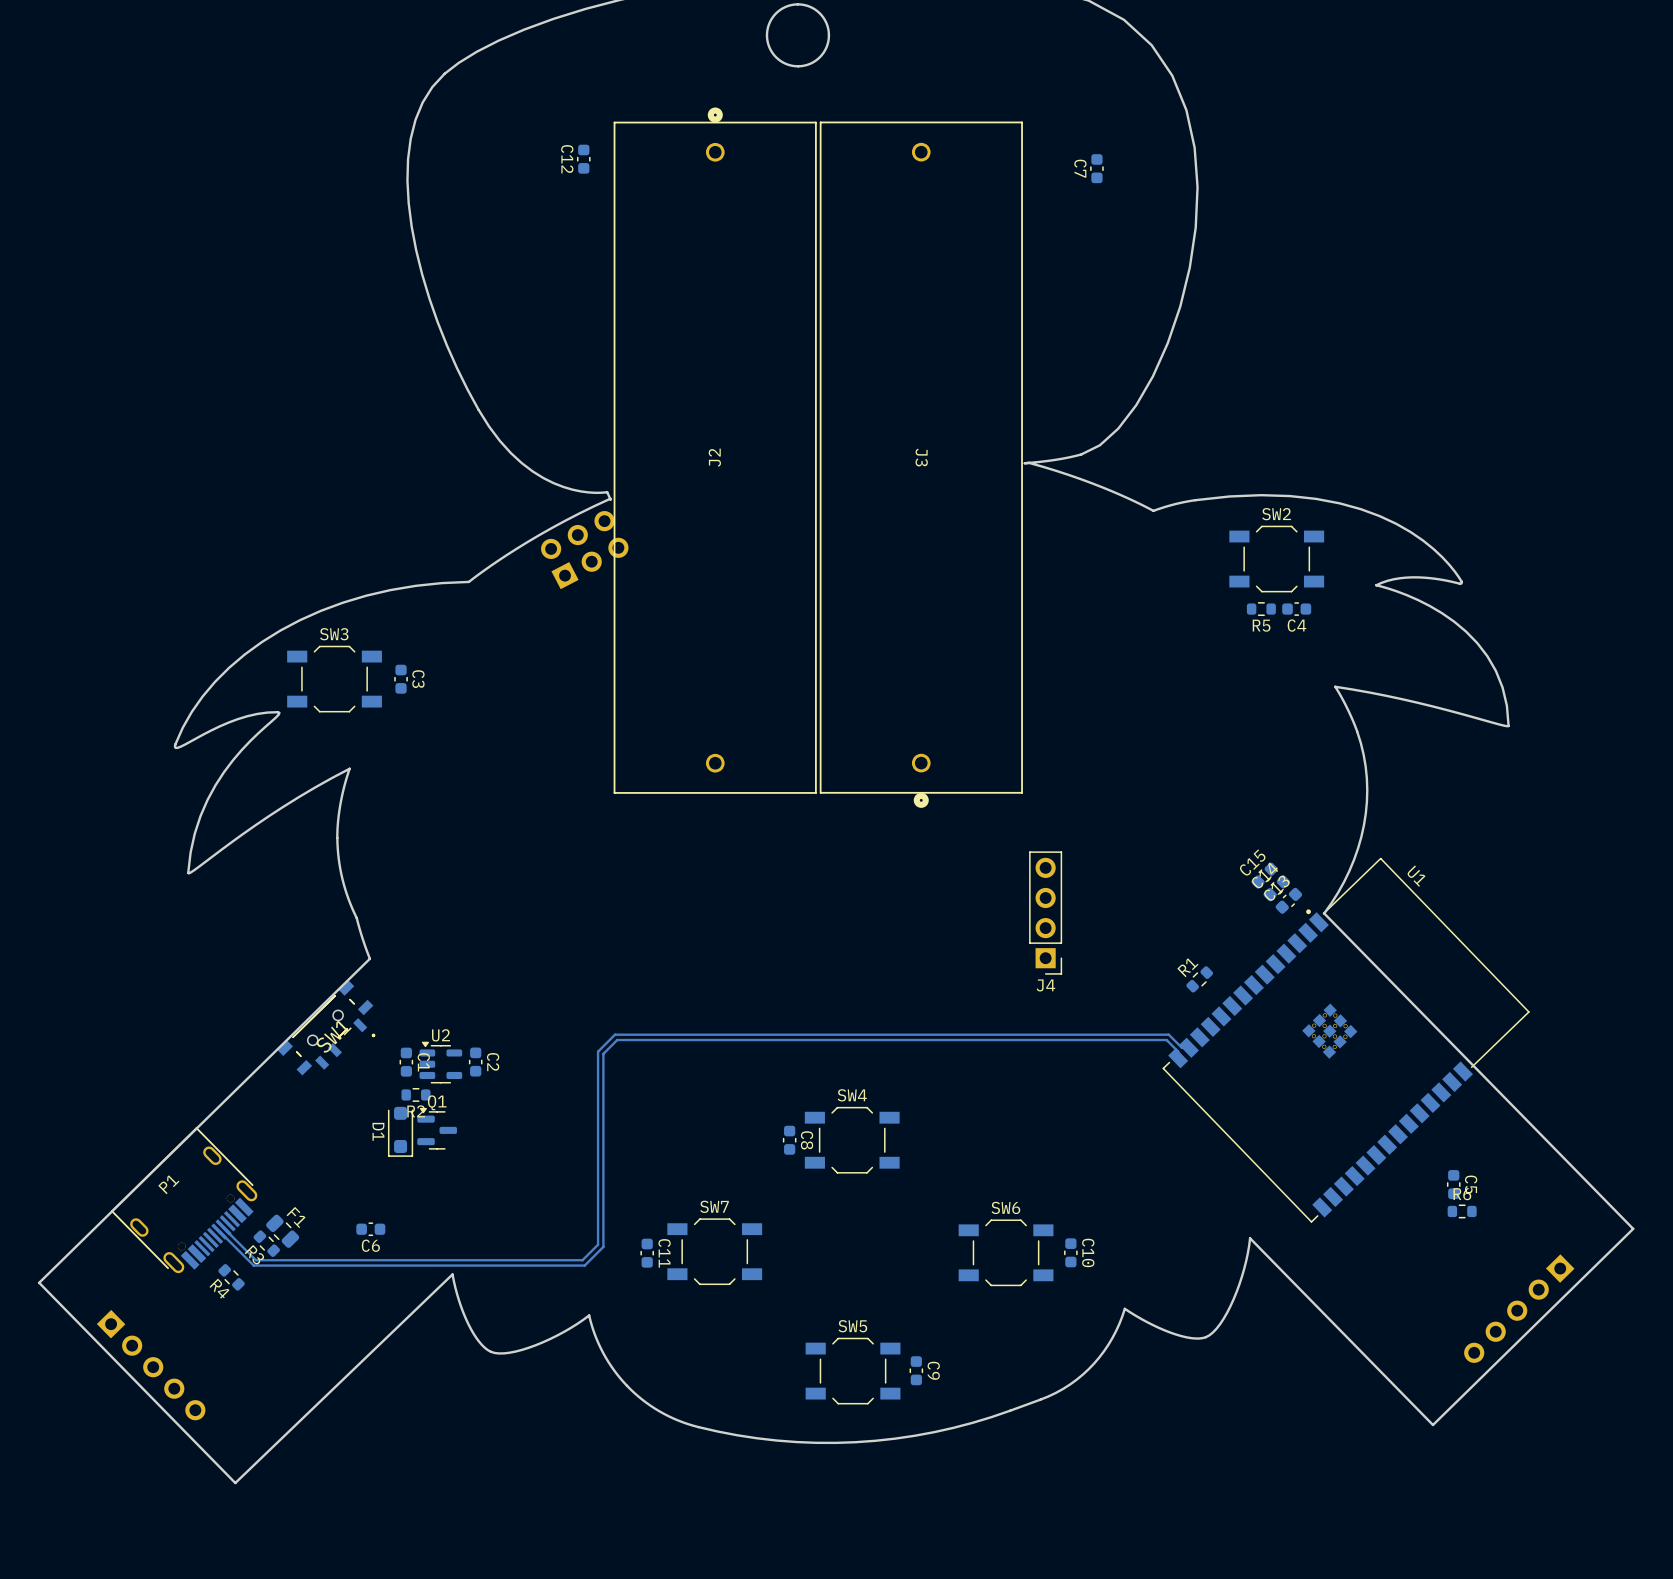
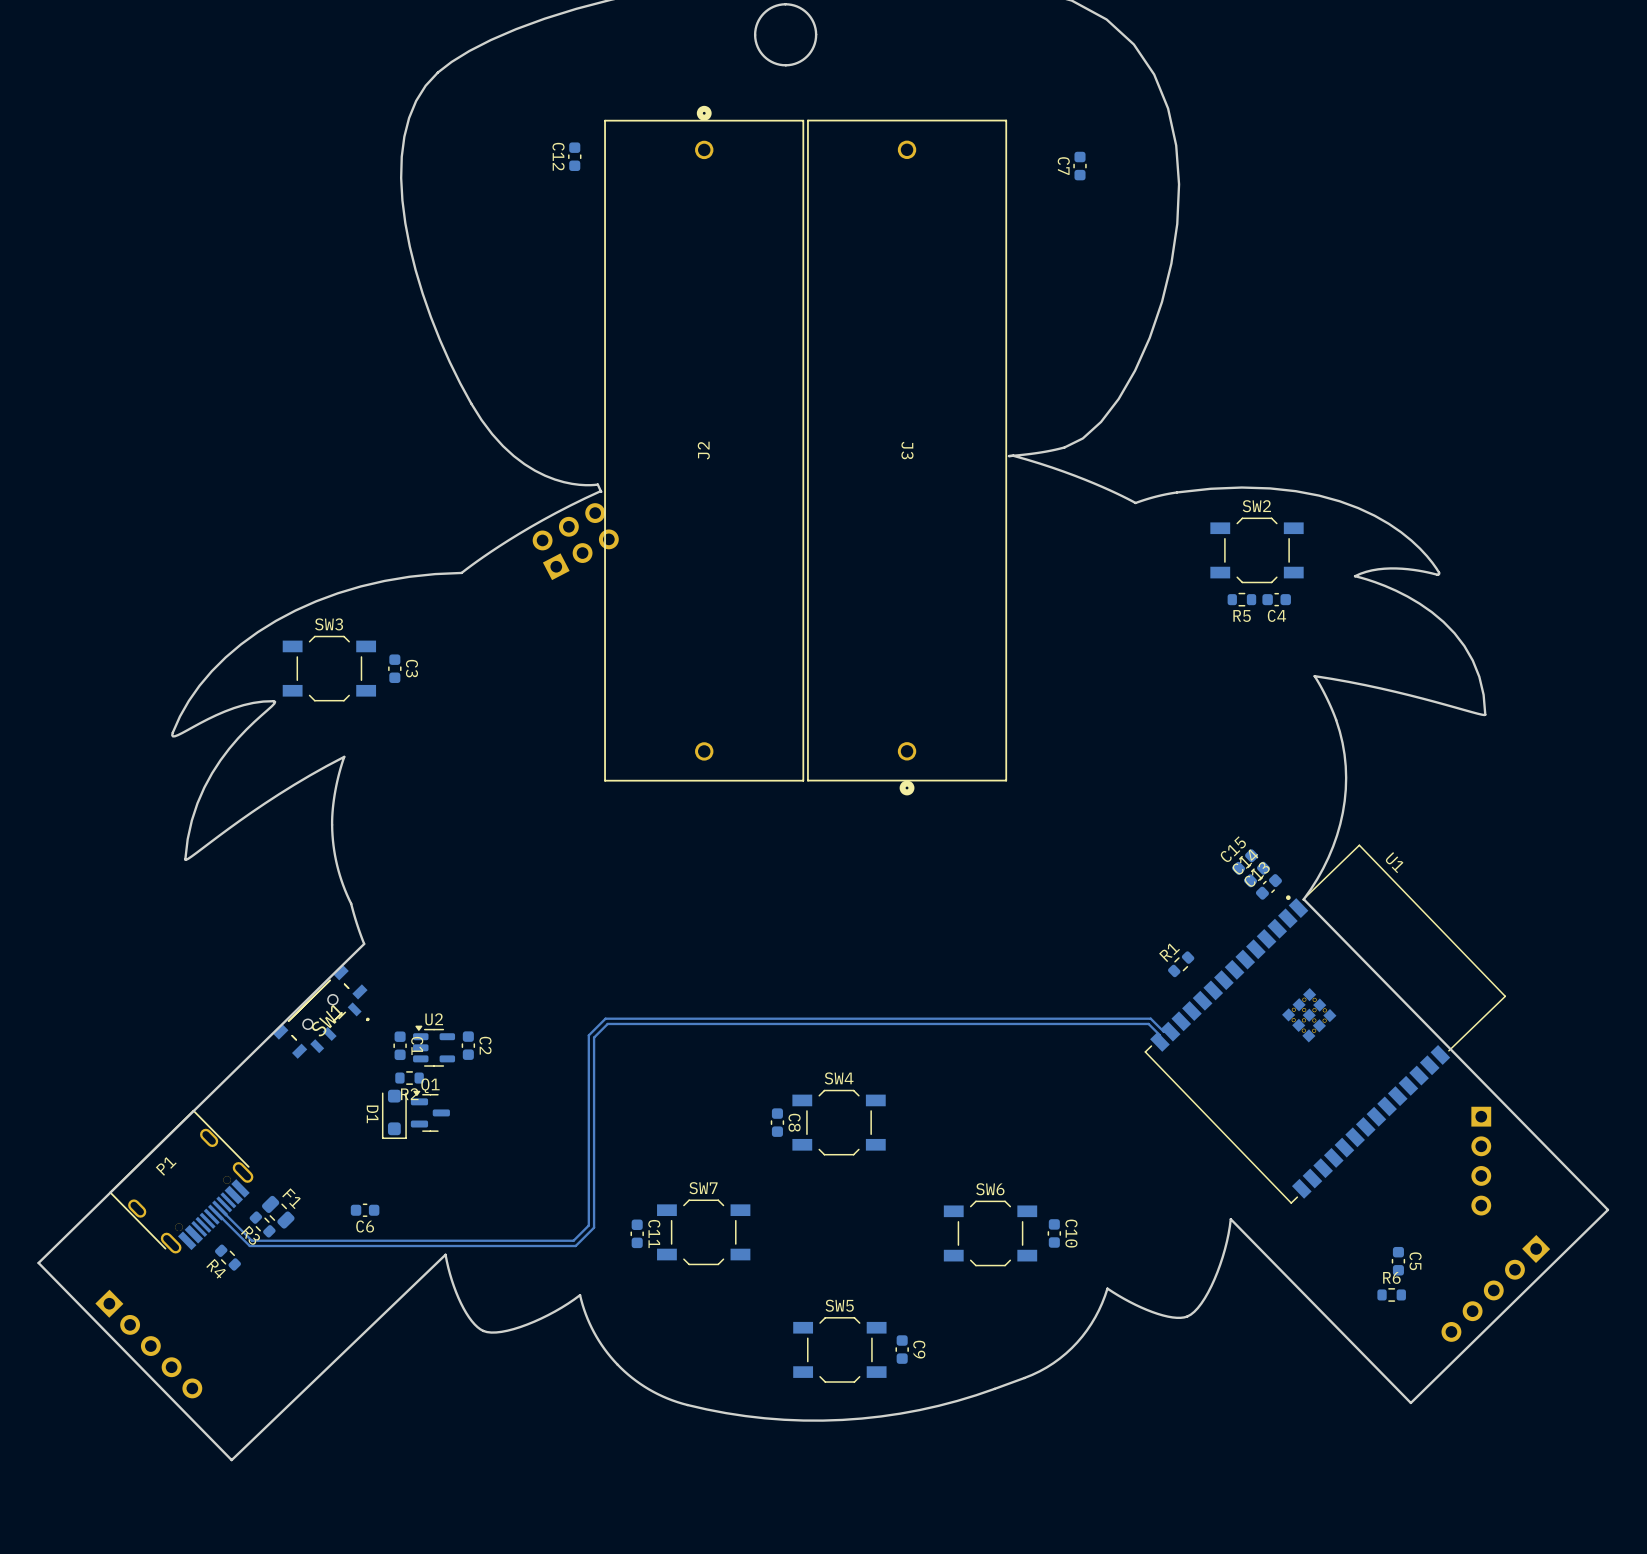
J4: (1045, 913) -> none
part: none -> (1481, 1161)
C5 position: (1453, 1184) -> (1398, 1261)
R6 position: (1462, 1211) -> (1391, 1294)

